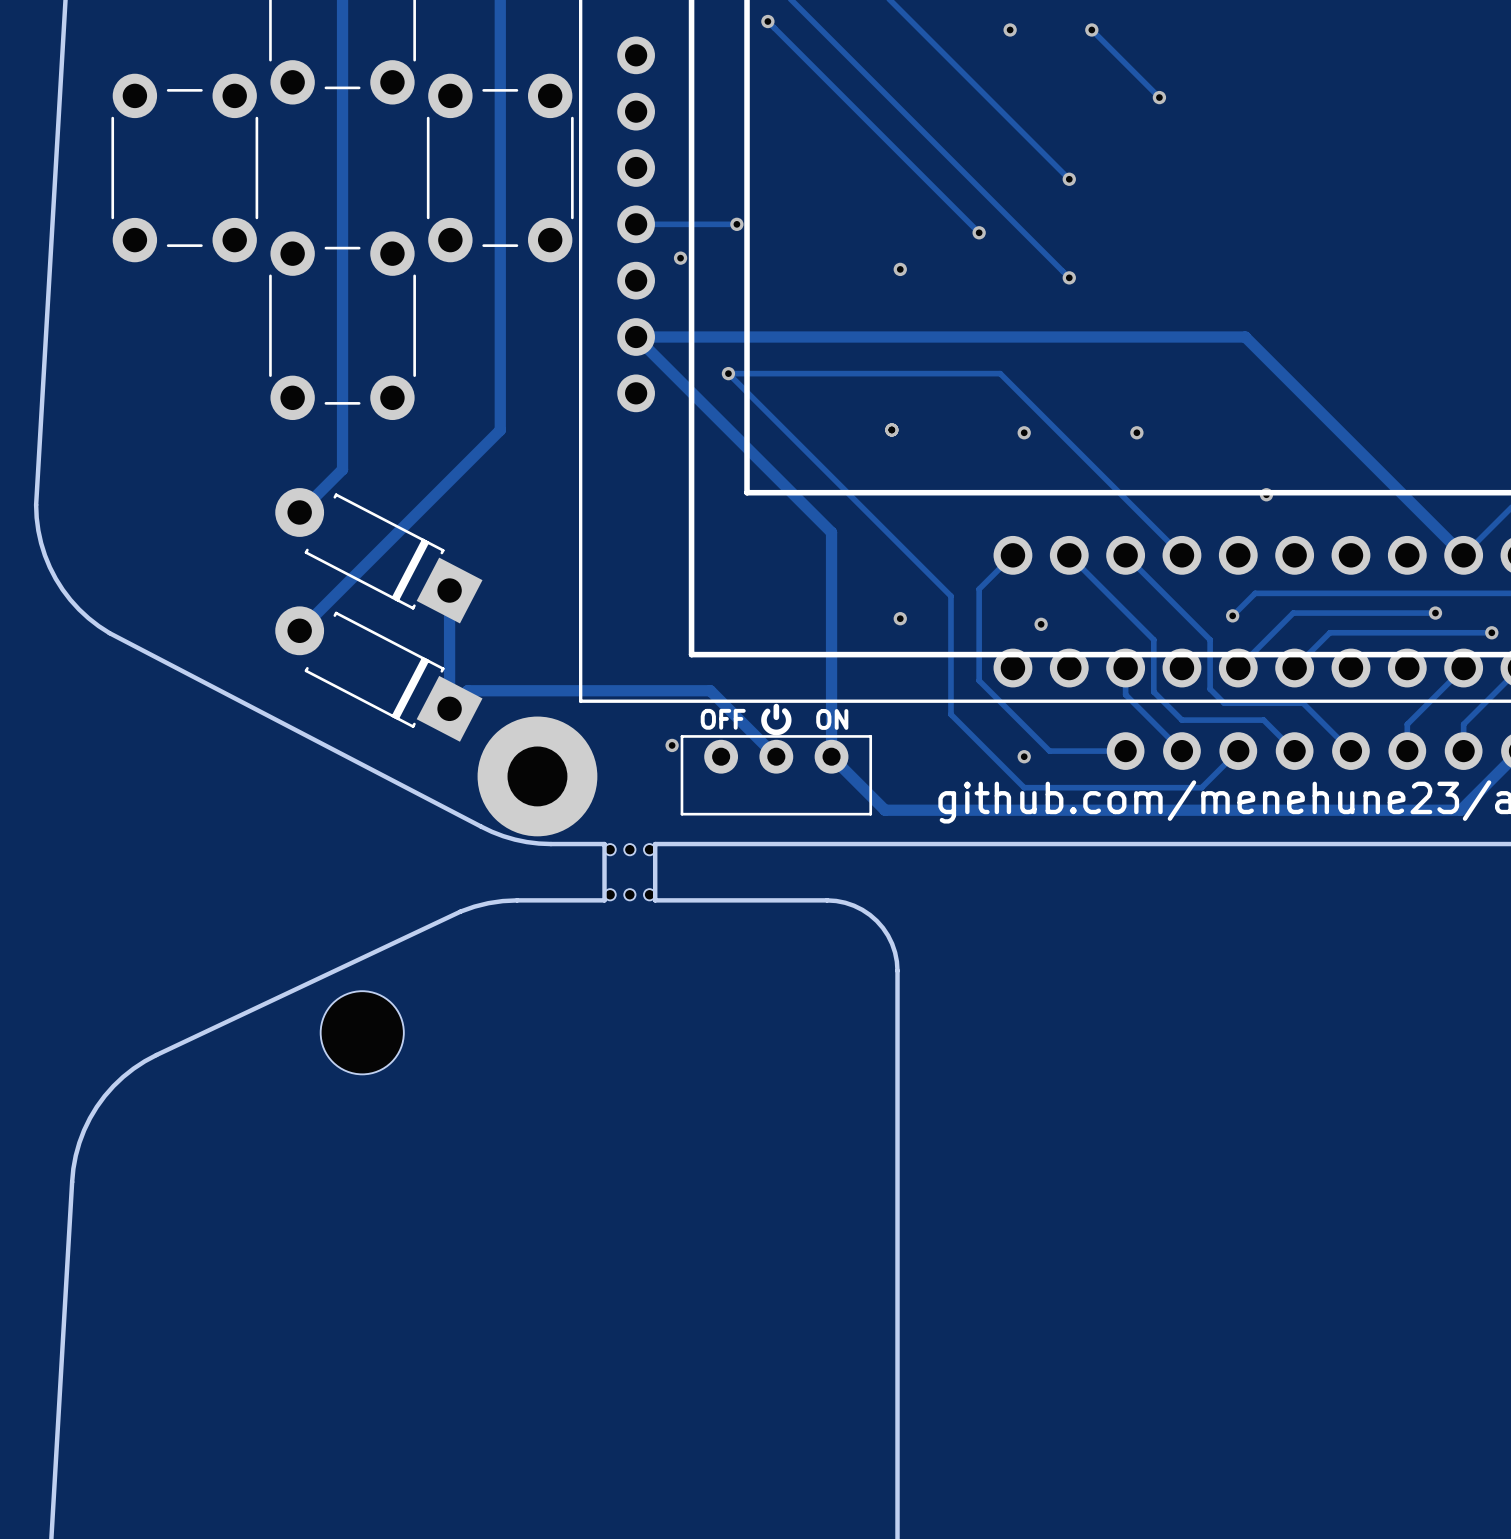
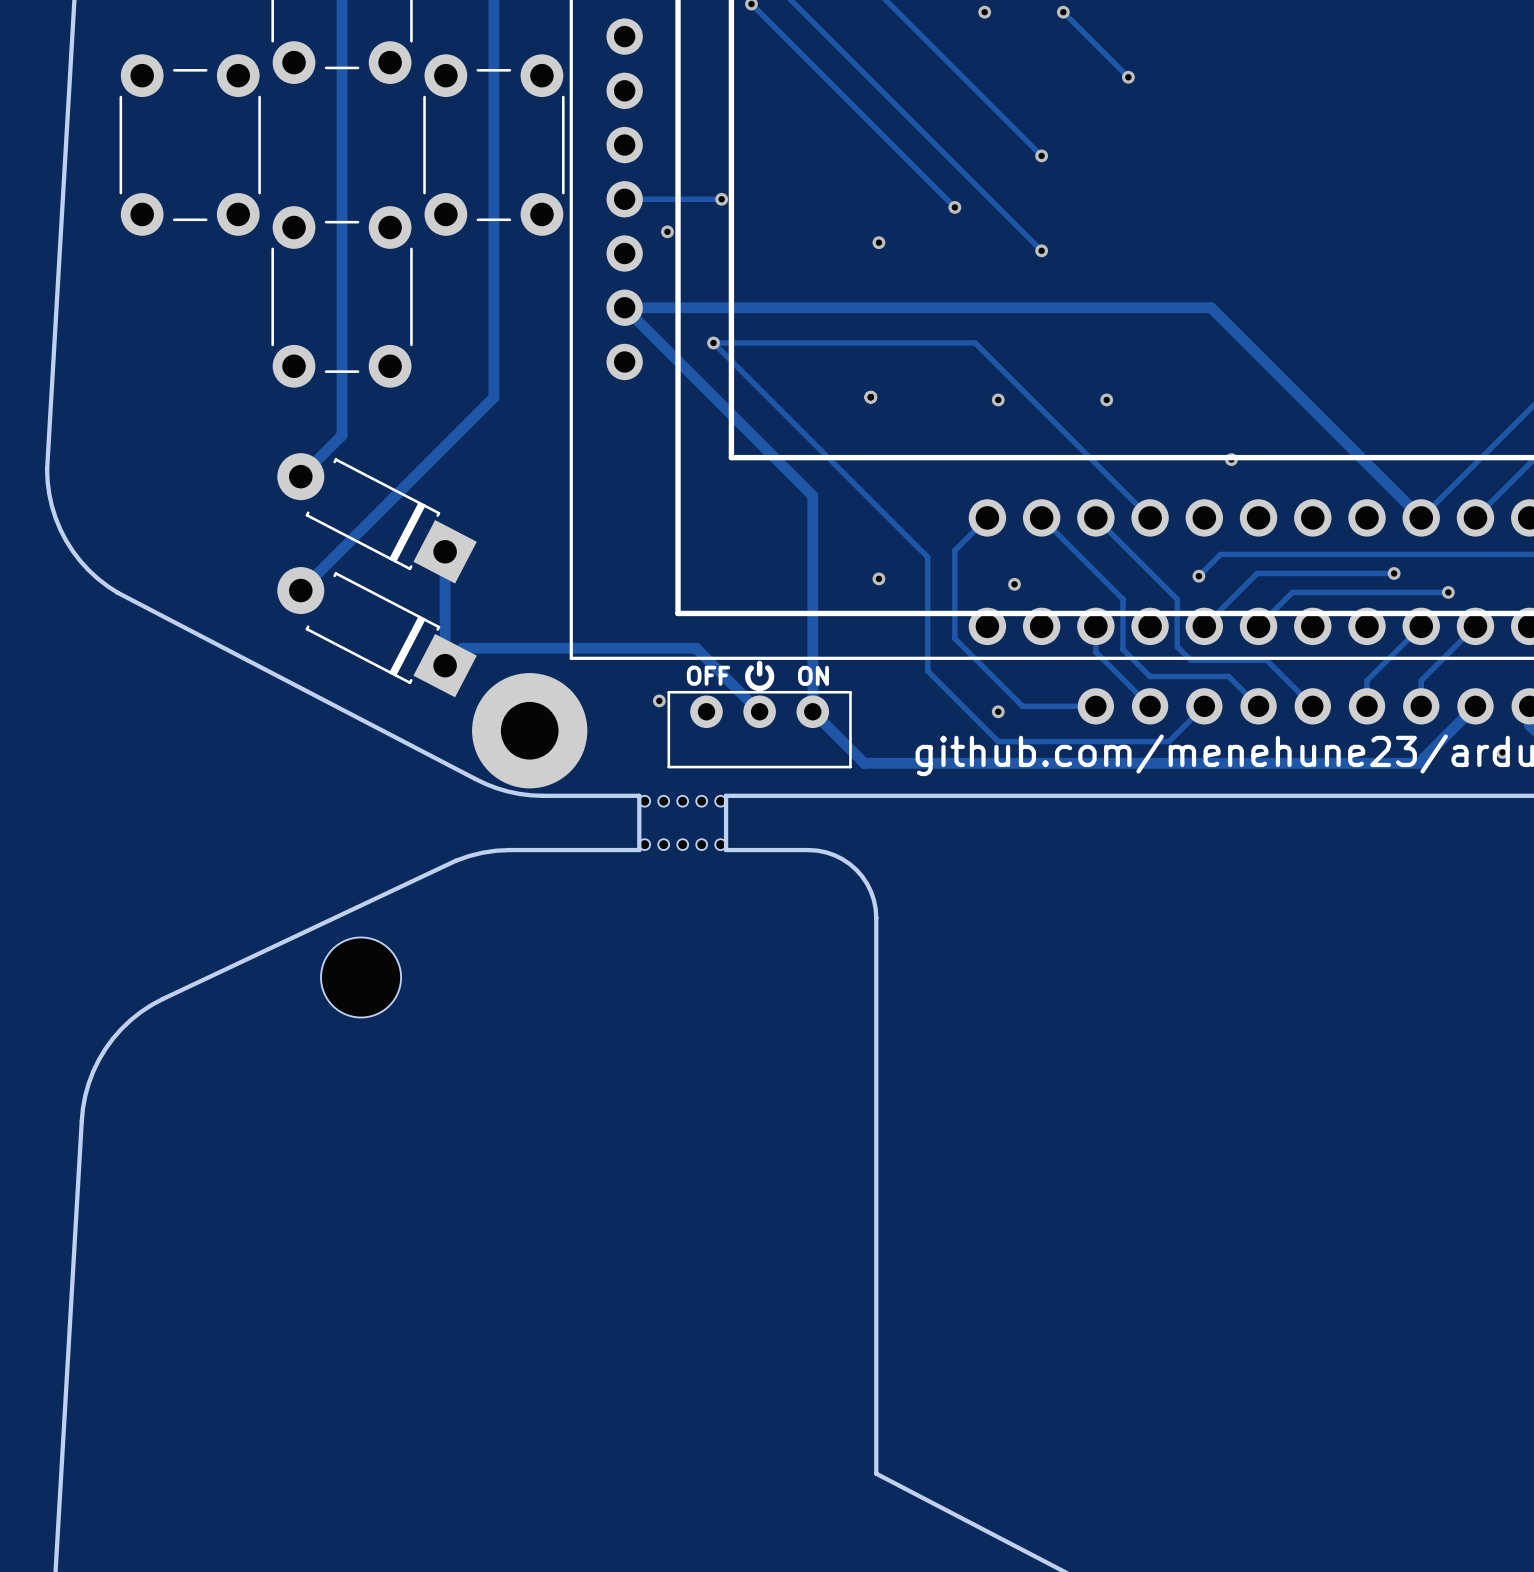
board edge: (604, 844) (604, 900) -> (594, 795) (639, 795) (639, 850) (594, 850)
board edge: (741, 844) (655, 844) (655, 900) (741, 900) -> (726, 795) (726, 850)
part: (629, 872) -> none
part: none -> (682, 822)

